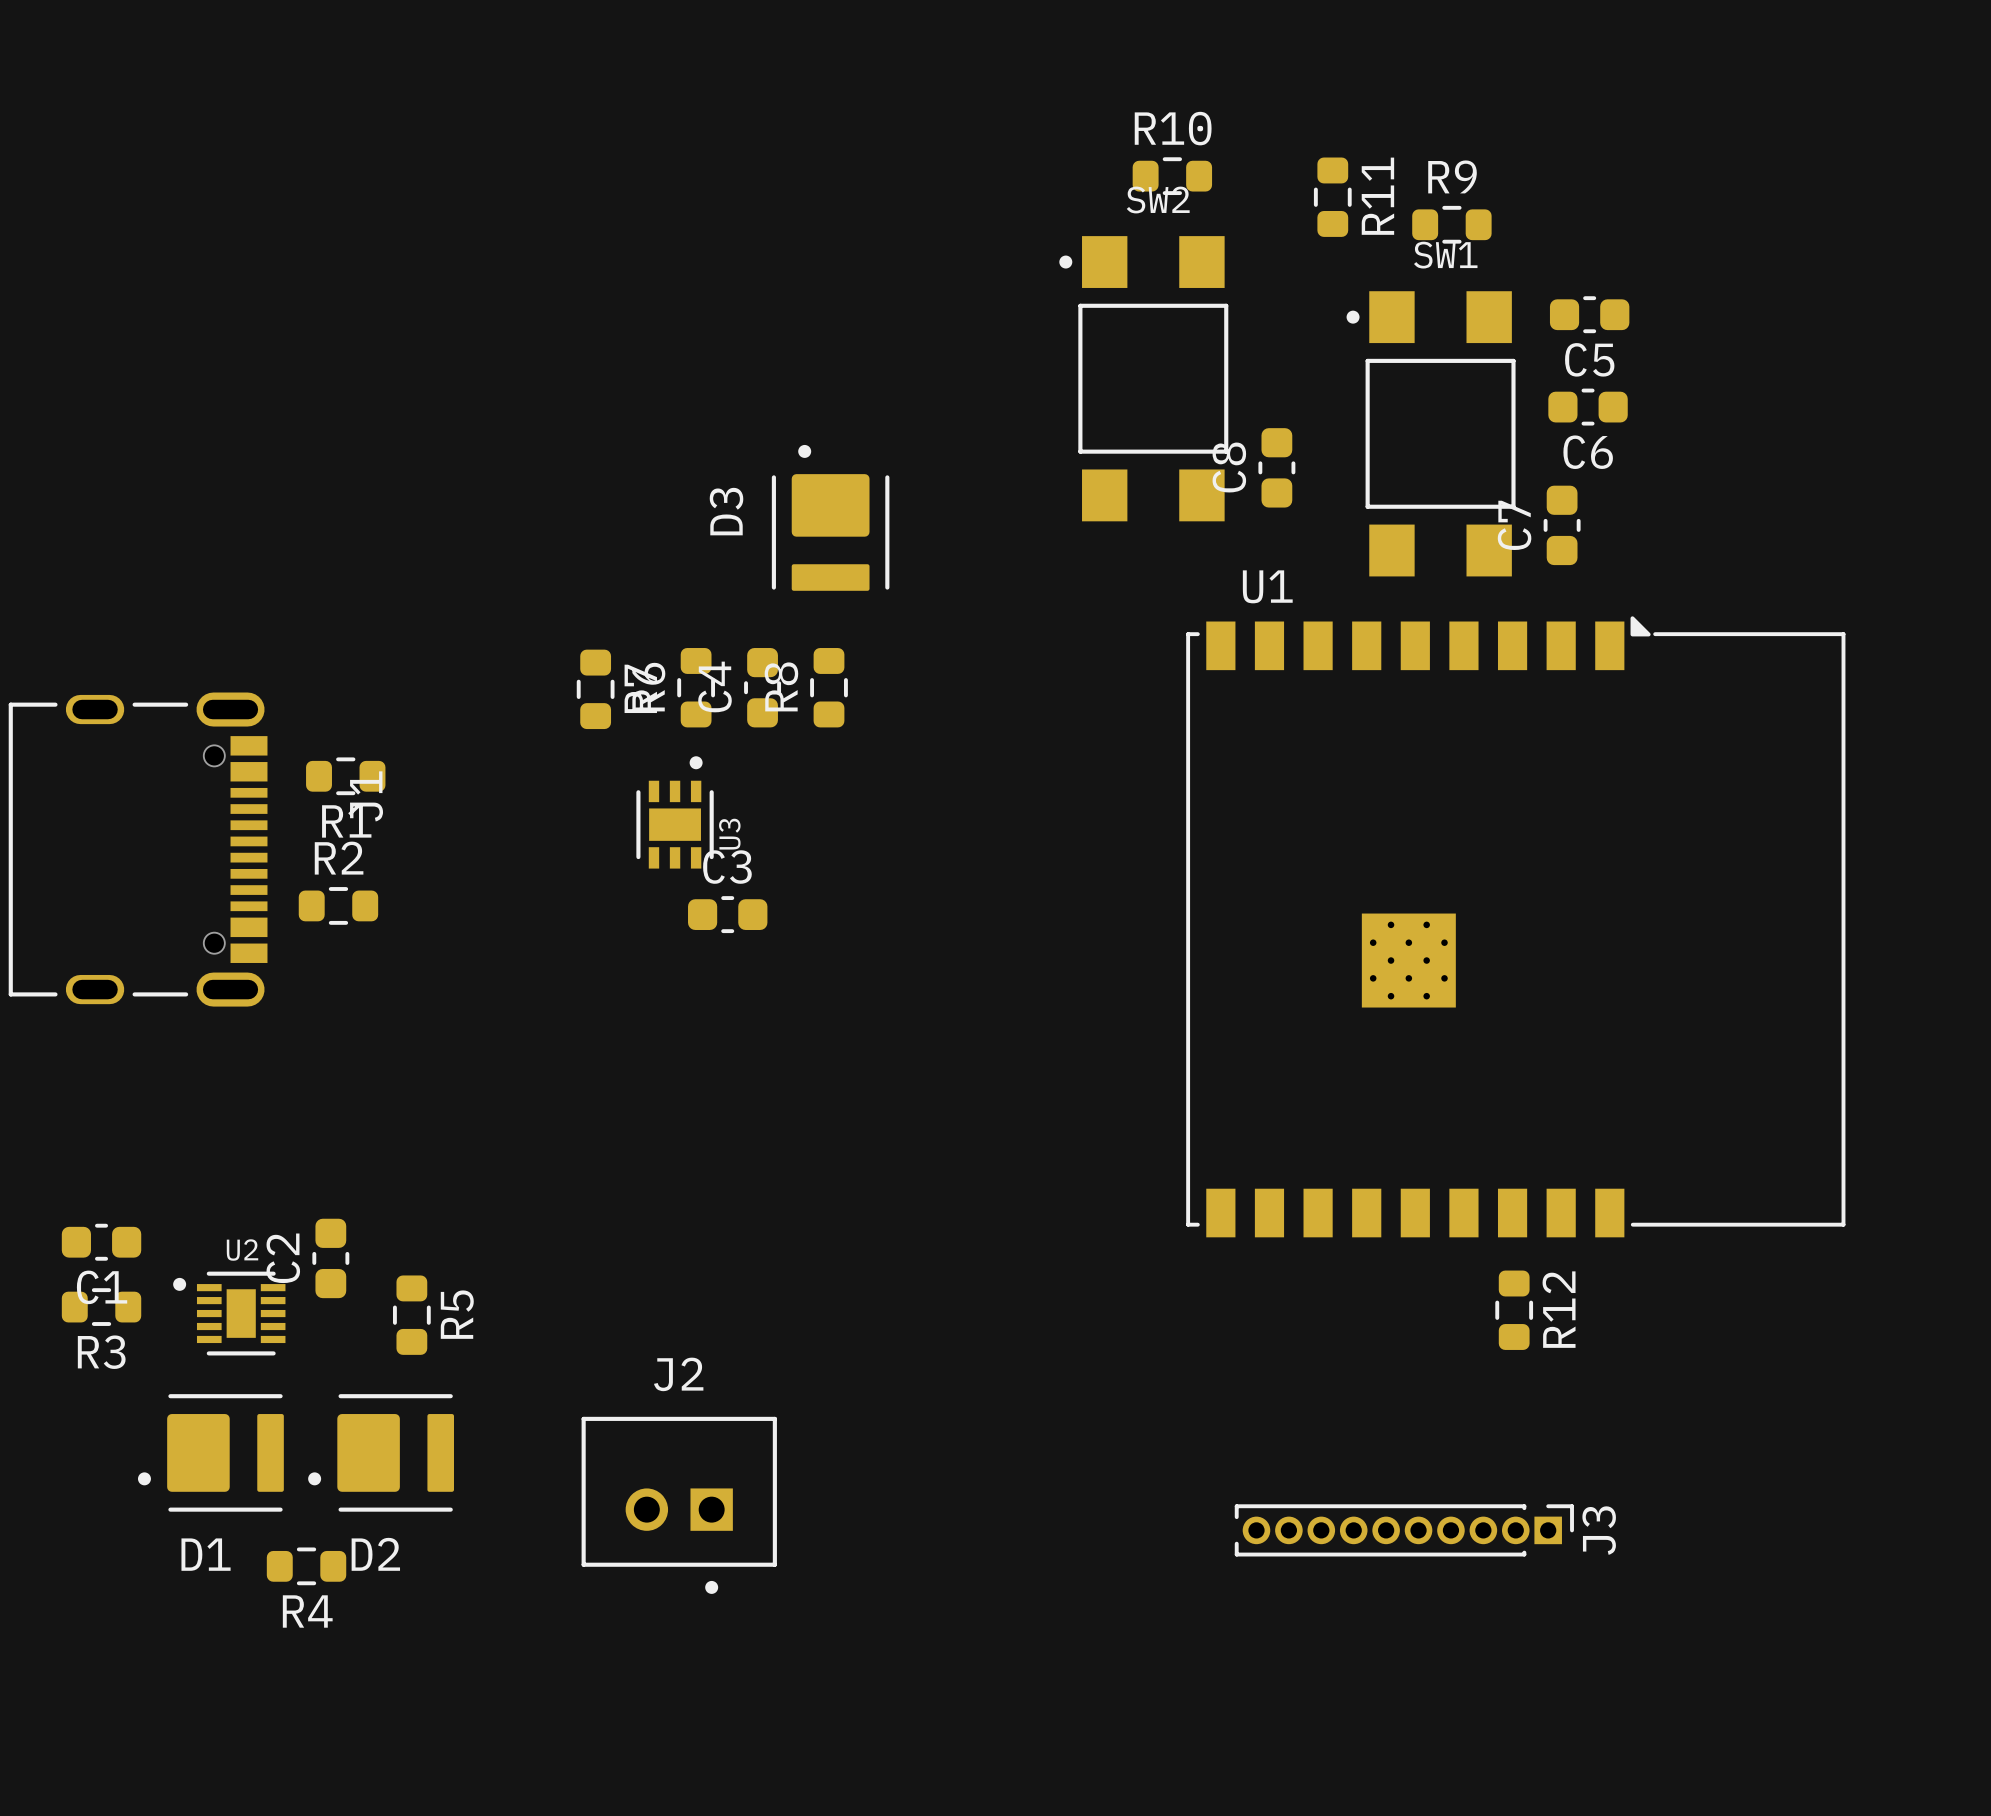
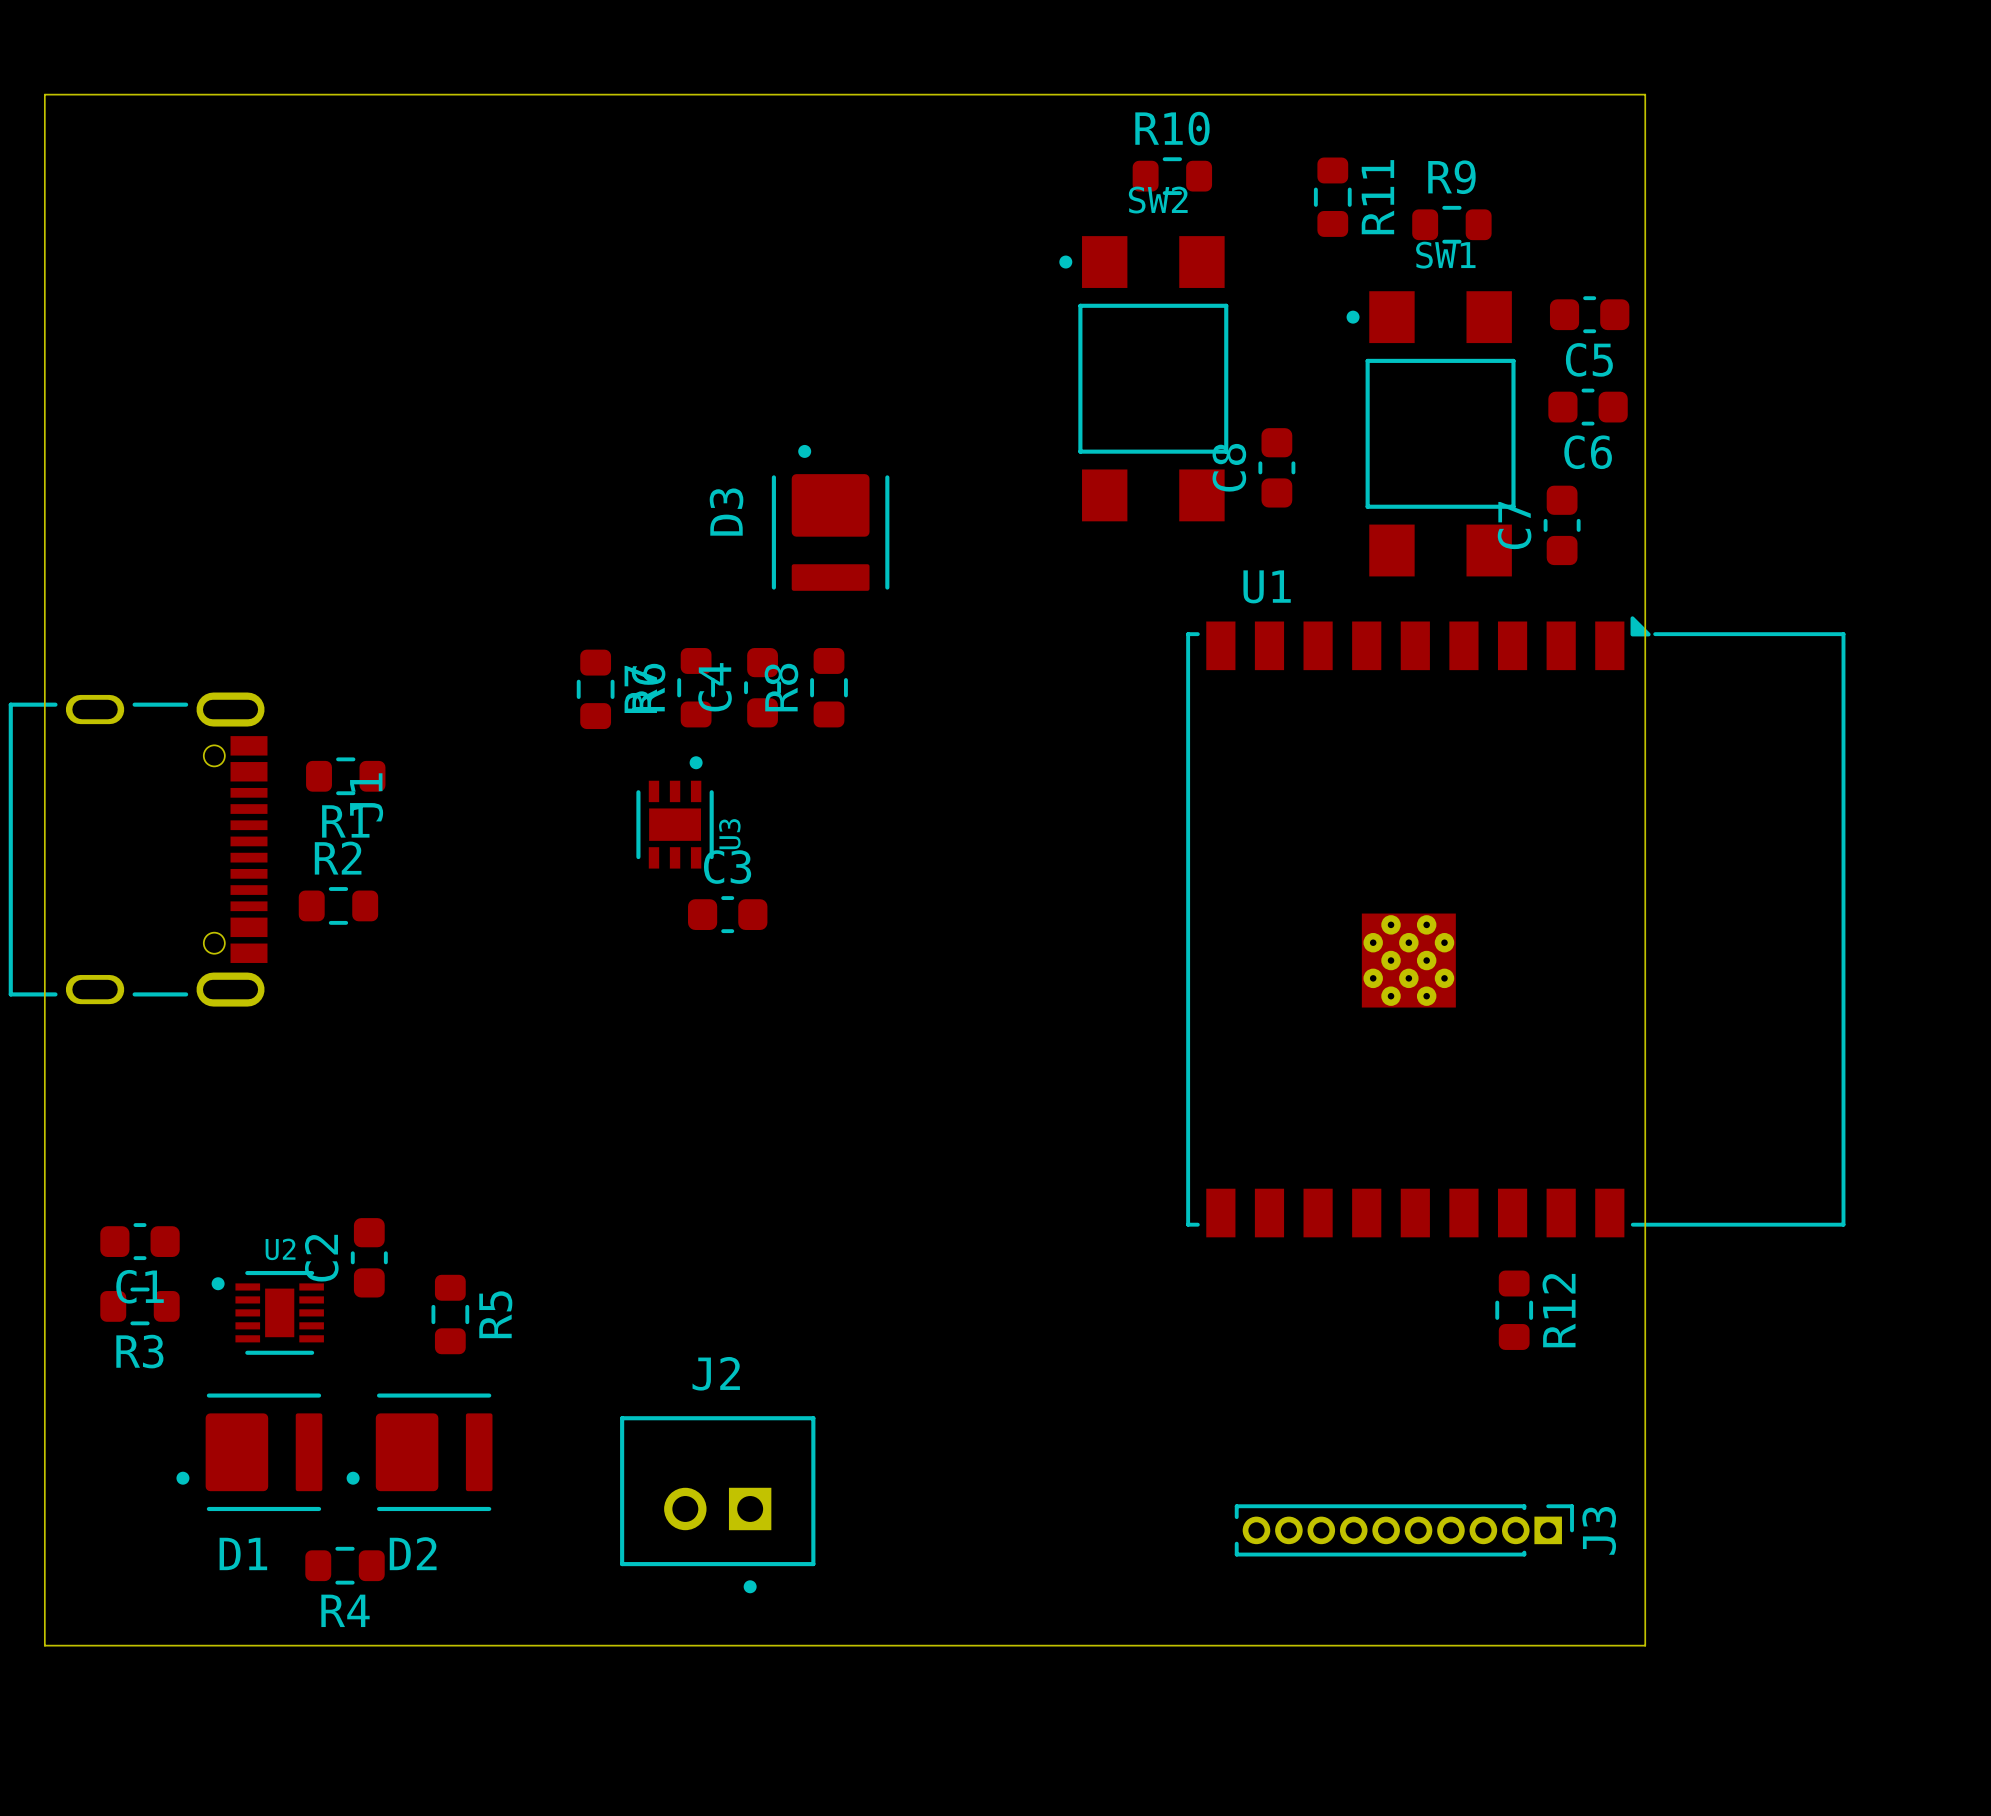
board edge: none -> (44, 94) (1645, 94) (1645, 1645) (44, 1645) (44, 94)
C1 position: (101, 1242) -> (140, 1241)
C2 position: (330, 1258) -> (369, 1257)
R3 position: (101, 1307) -> (140, 1306)
U2 position: (229, 1313) -> (267, 1312)
R5 position: (411, 1315) -> (450, 1314)
D1 position: (210, 1452) -> (249, 1452)
D2 position: (381, 1452) -> (419, 1452)
J2 position: (679, 1505) -> (717, 1504)
R4 position: (306, 1566) -> (345, 1565)

